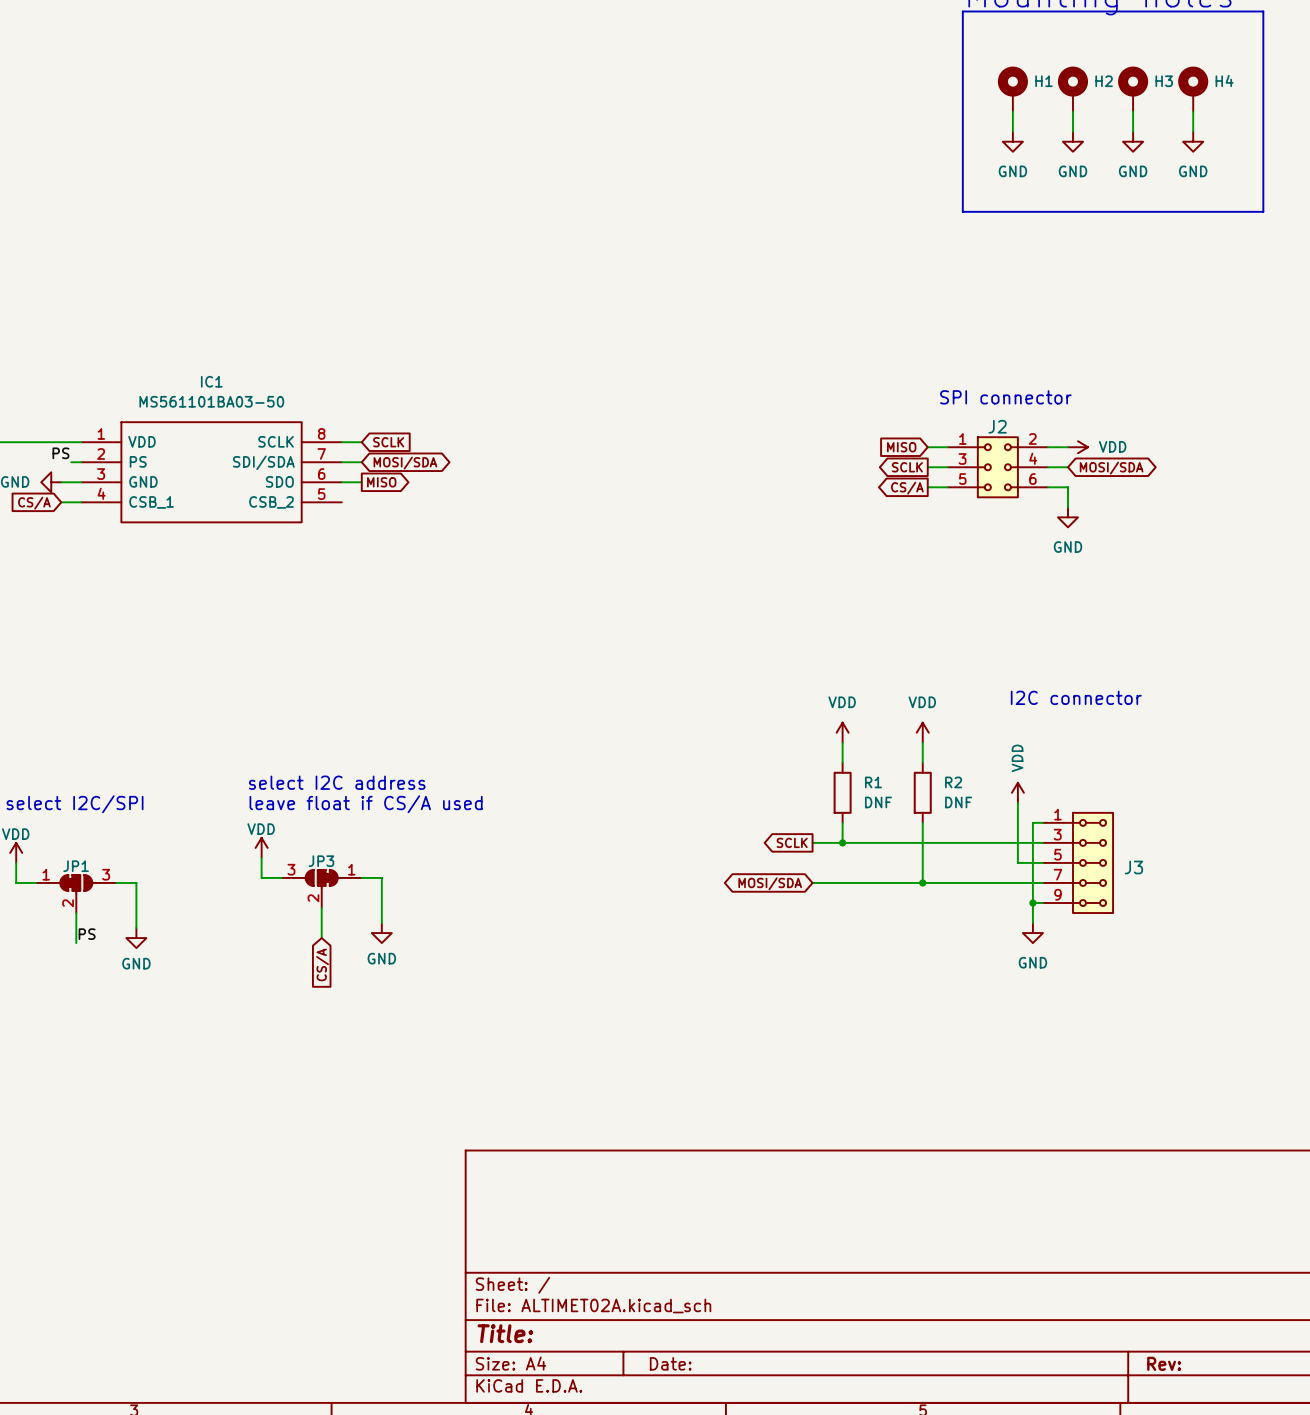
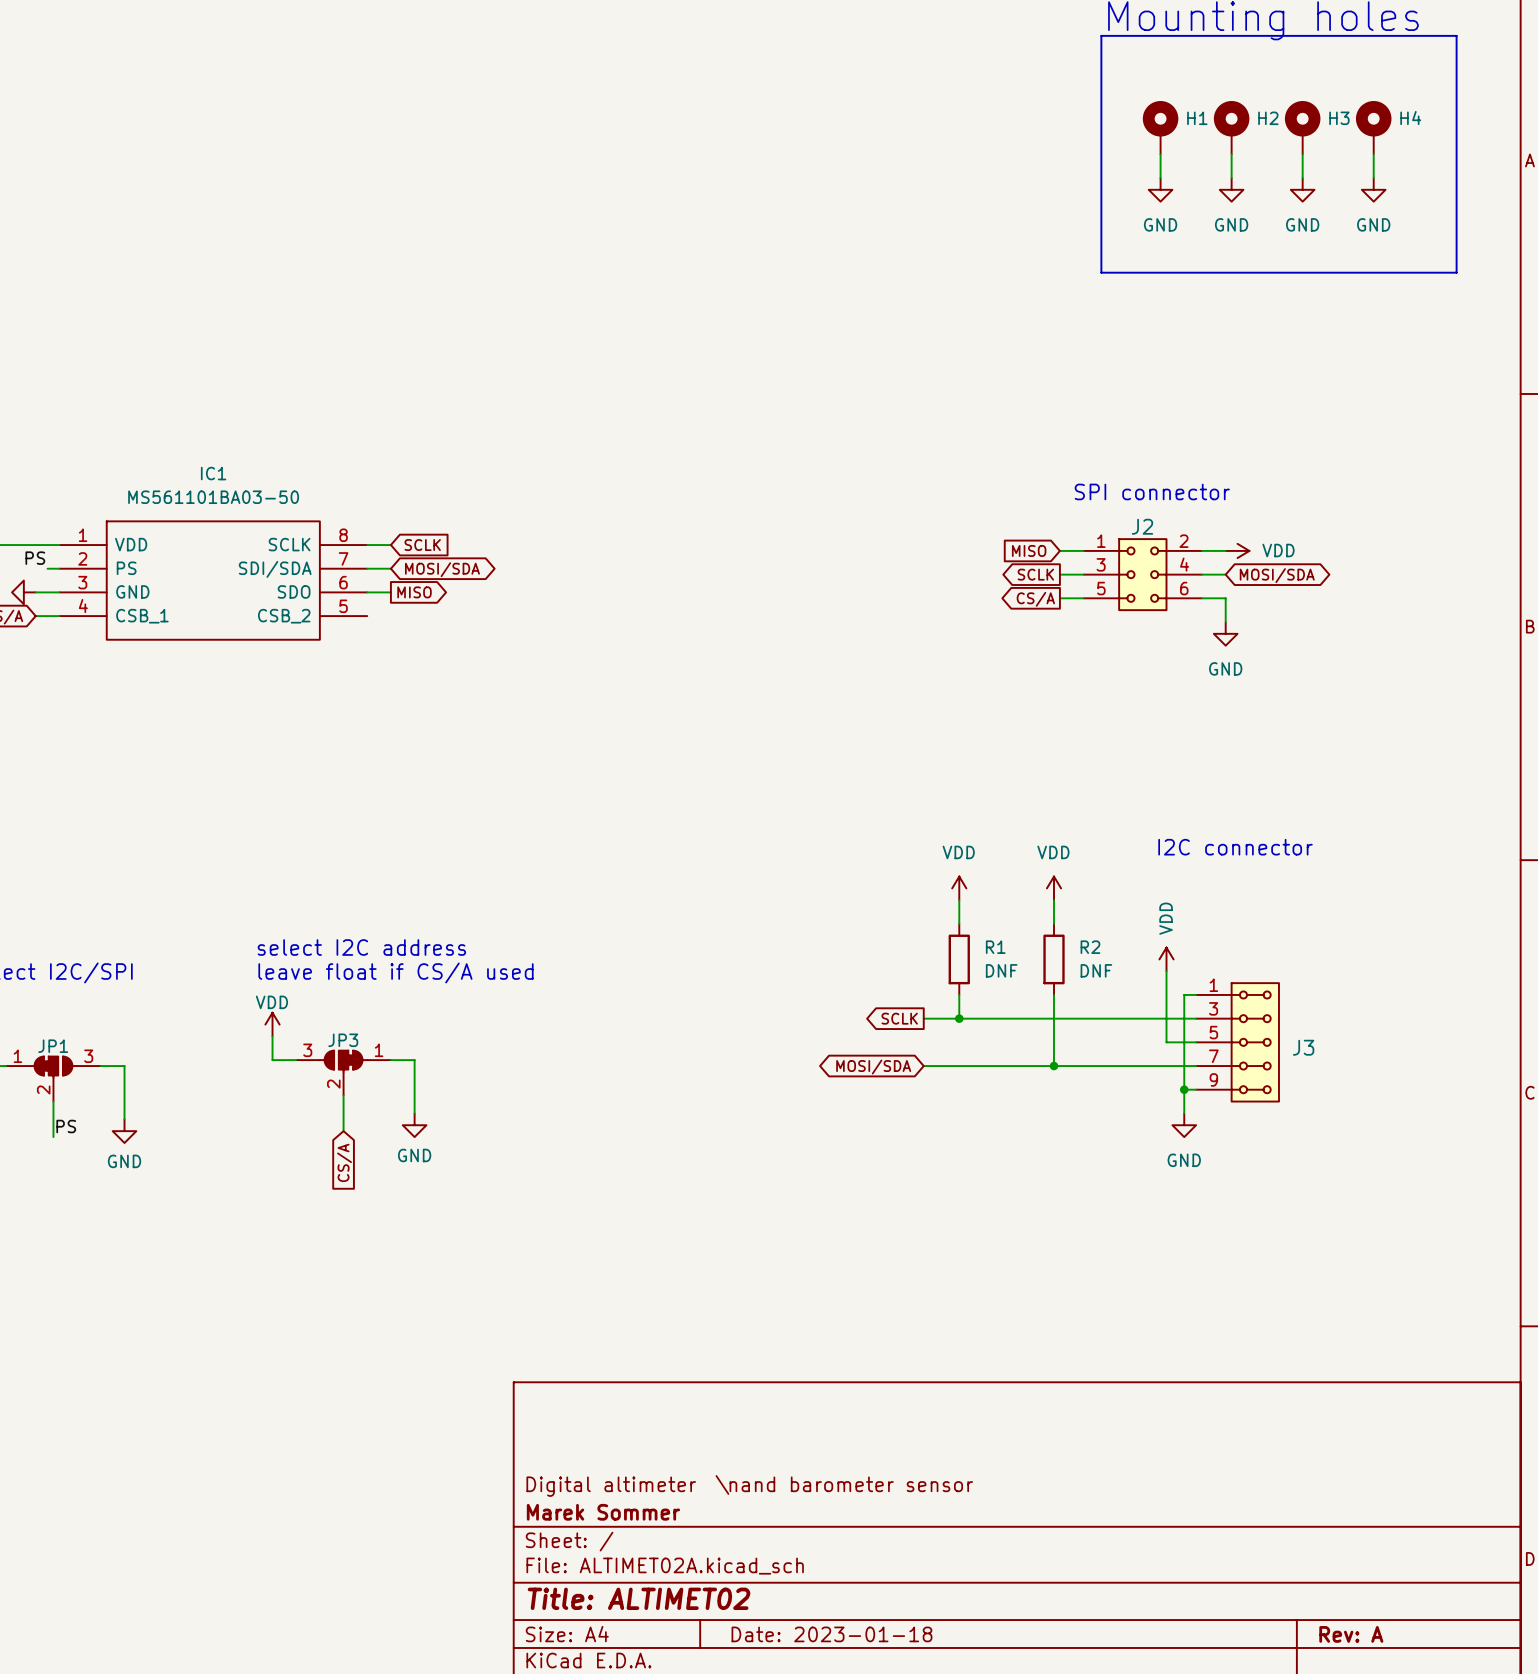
title block: none -> Digital altimeter \nand barometer sensor (749, 1485)
title block: none -> Marek Sommer (603, 1512)
title block: Title: (505, 1333) -> Title: ALTIMET02 (639, 1598)
title block: Date: (670, 1363) -> Date: 2023-01-18 (831, 1634)
title block: Rev: (1164, 1363) -> Rev: A (1351, 1634)

